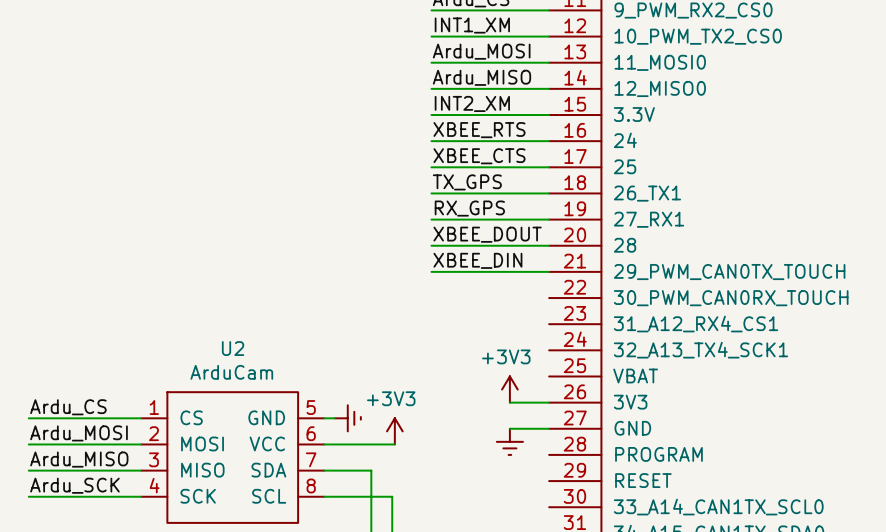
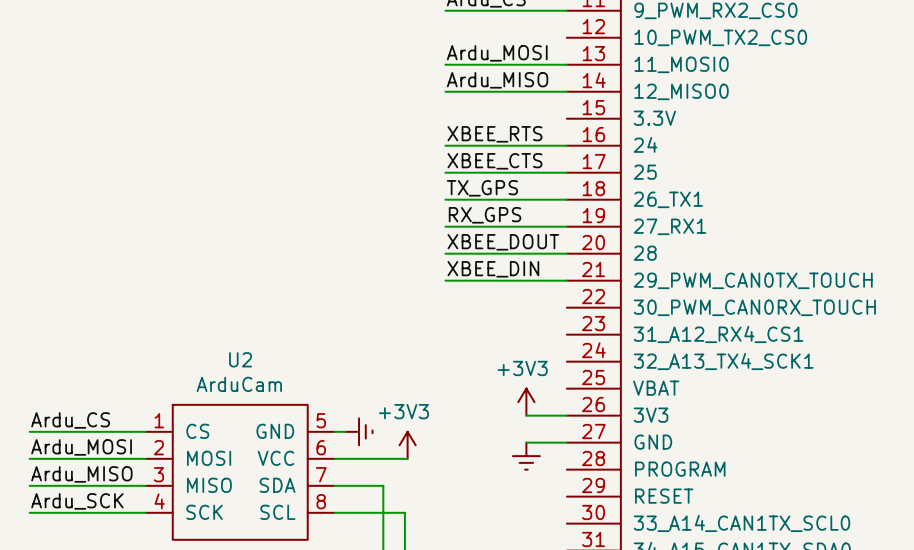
label: INT1_XM (472, 25) -> none
wire: (431, 36) (549, 36) -> none
label: INT2_XM (472, 103) -> none
wire: (431, 115) (549, 115) -> none

